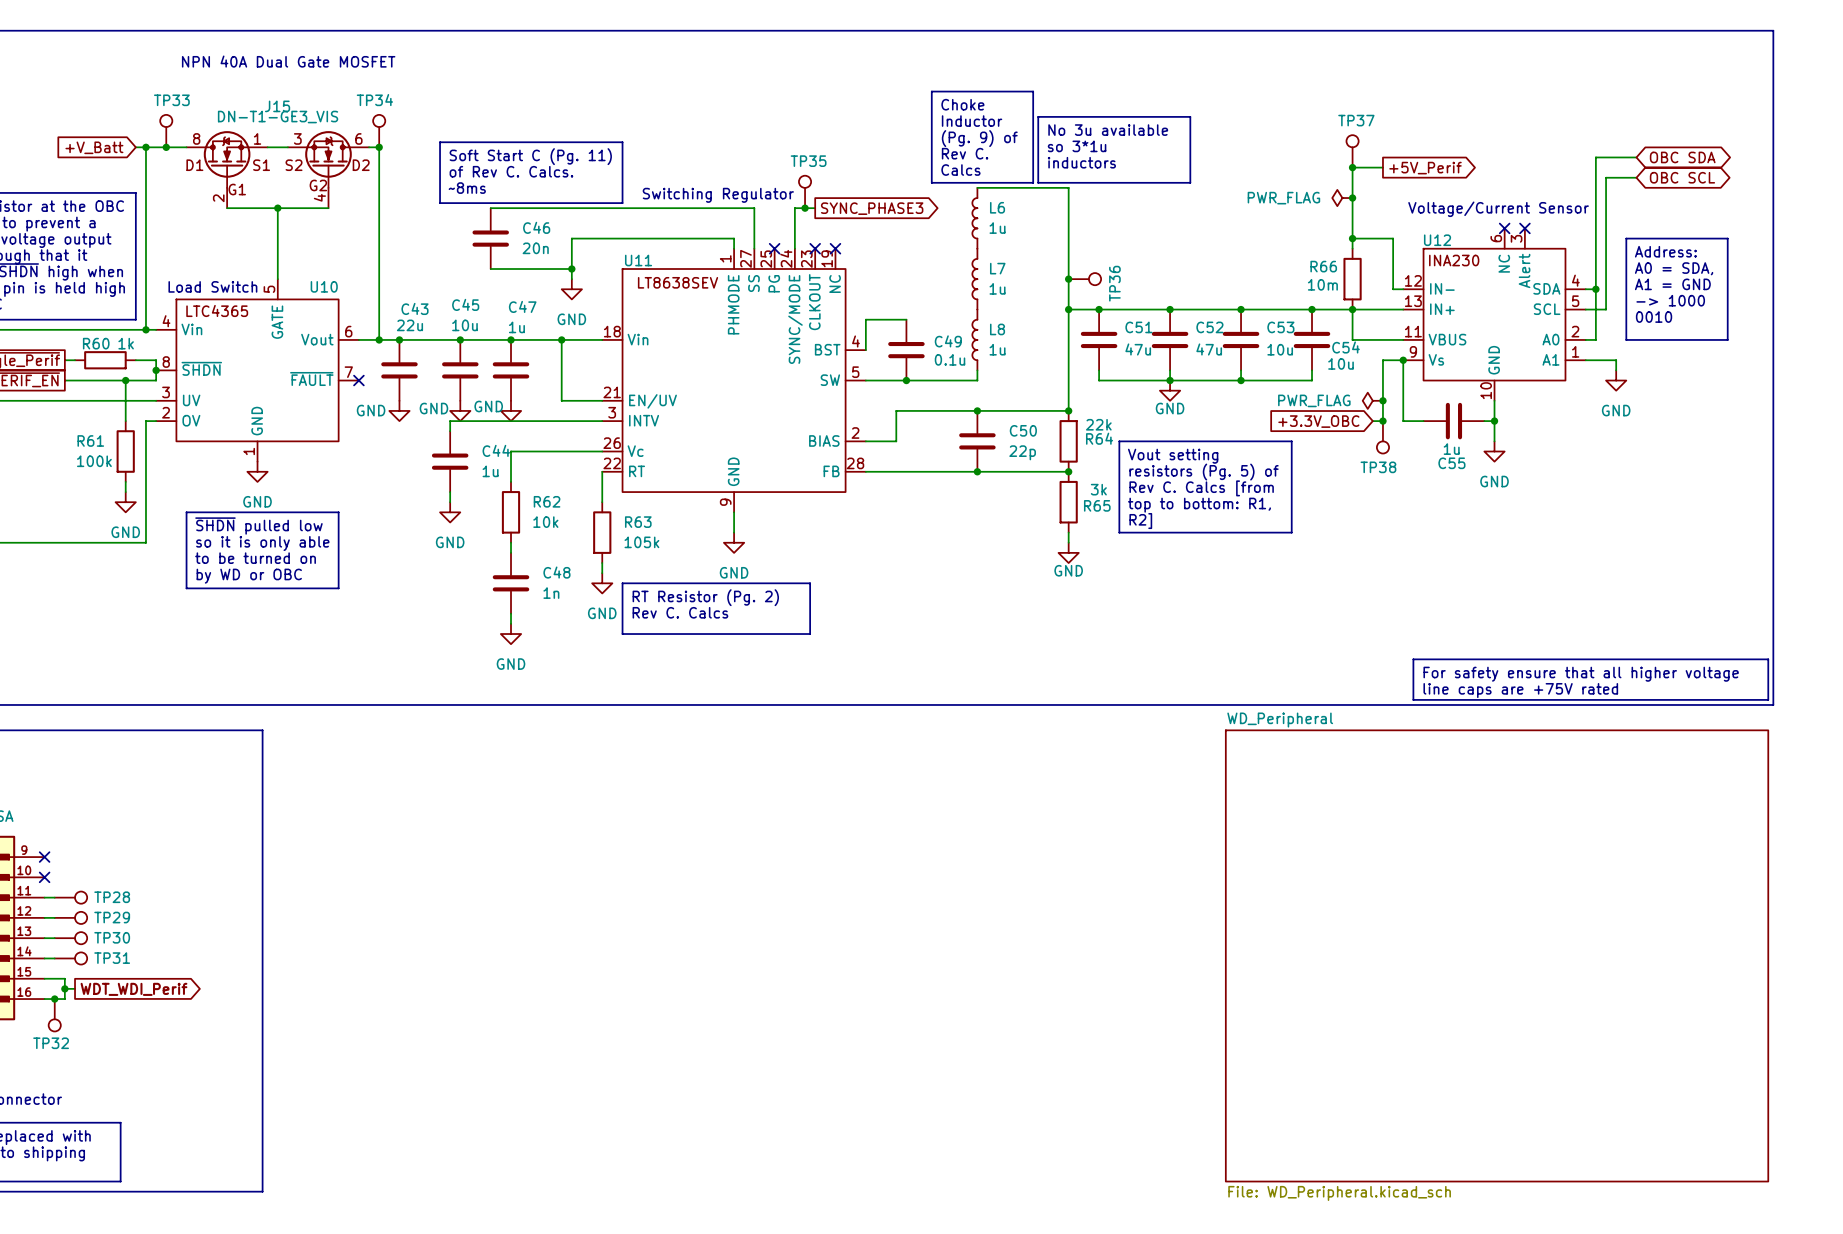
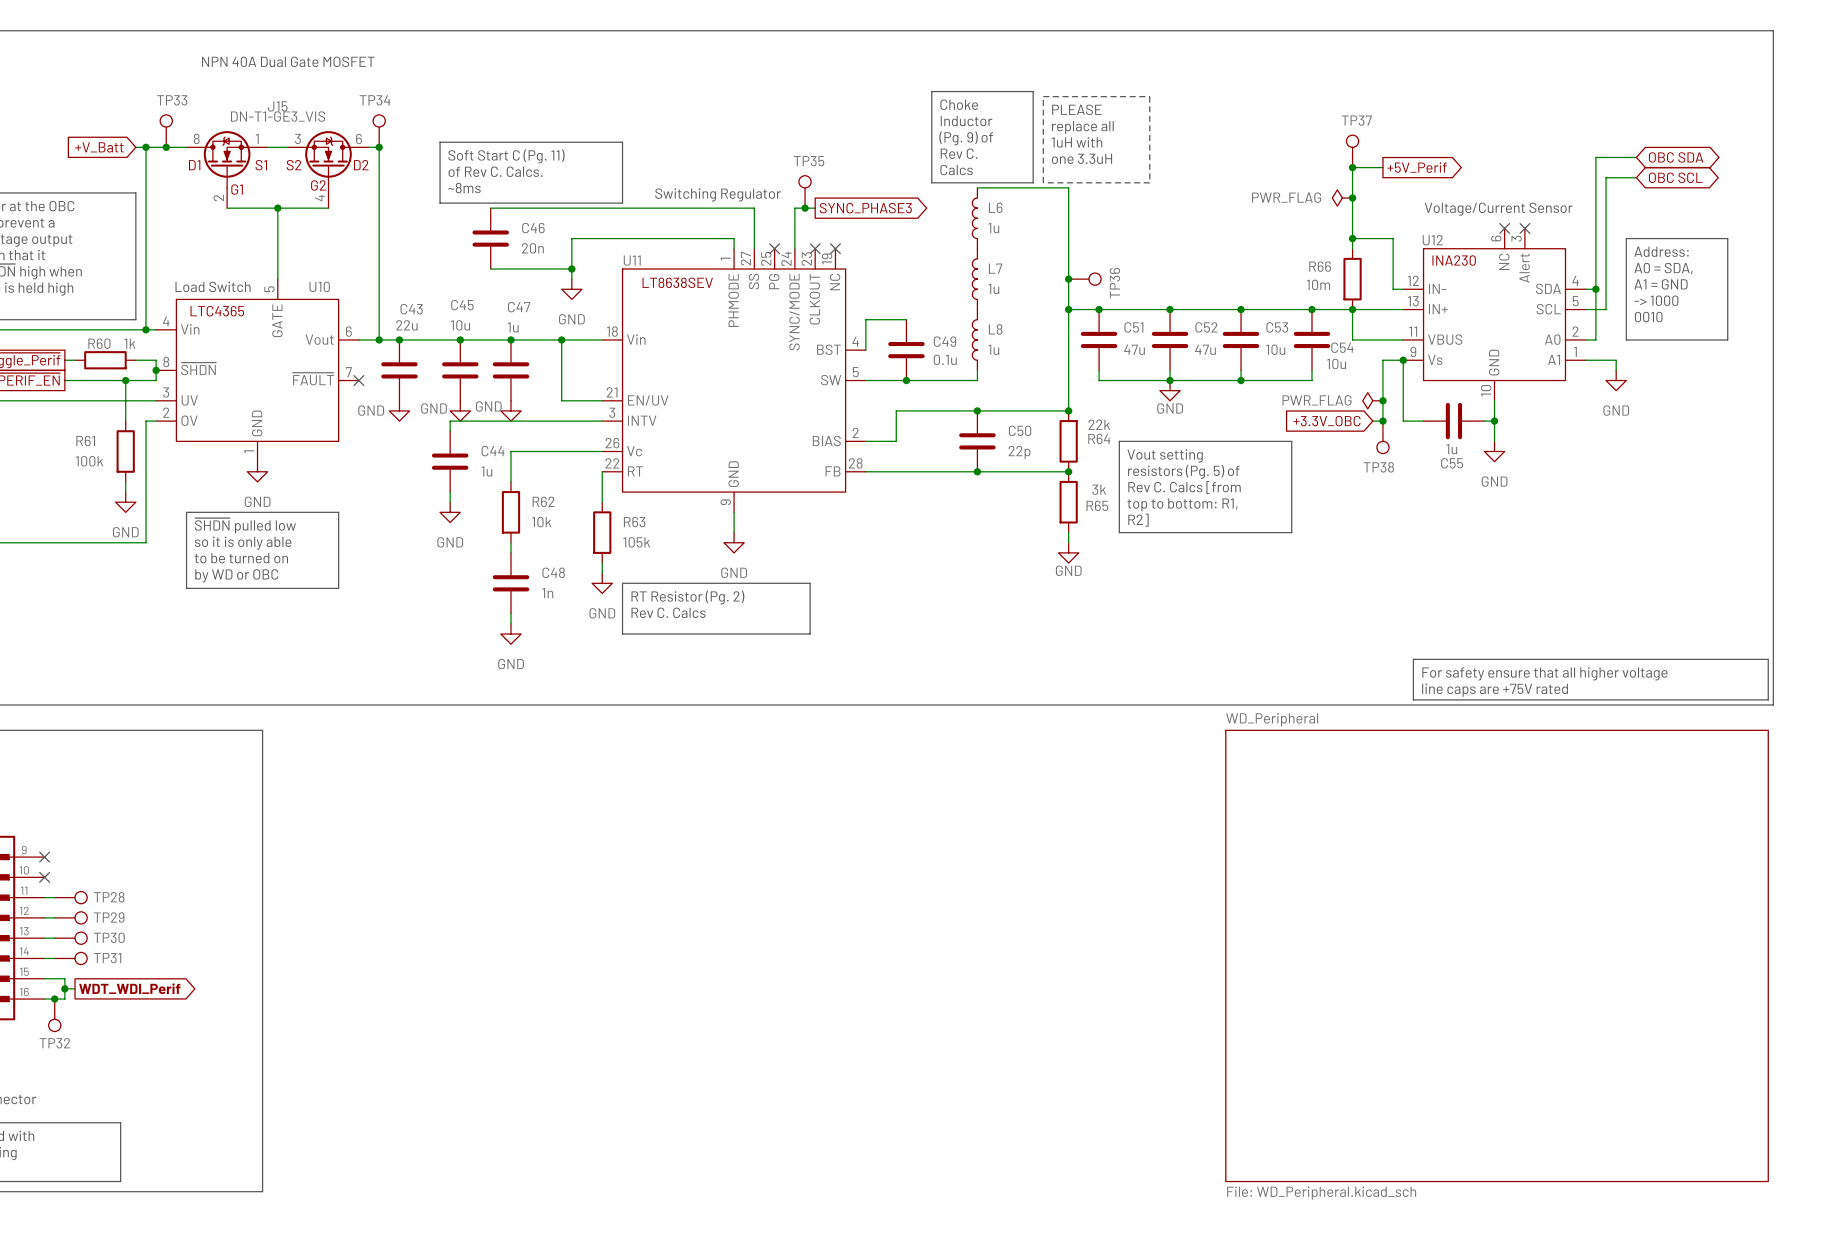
text: none -> PLEASE (1076, 109)
line: (1038, 116) (1190, 116) (1190, 182) (1038, 182) (1038, 116) -> (1043, 96) (1043, 182) (1149, 182) (1149, 96) (1043, 96)
text: No 3u available (1108, 130) -> replace all (1082, 127)
text: so 3*1u (1077, 146) -> 1uH with (1077, 142)
text: inductors (1081, 162) -> one 3.3uH (1081, 158)

